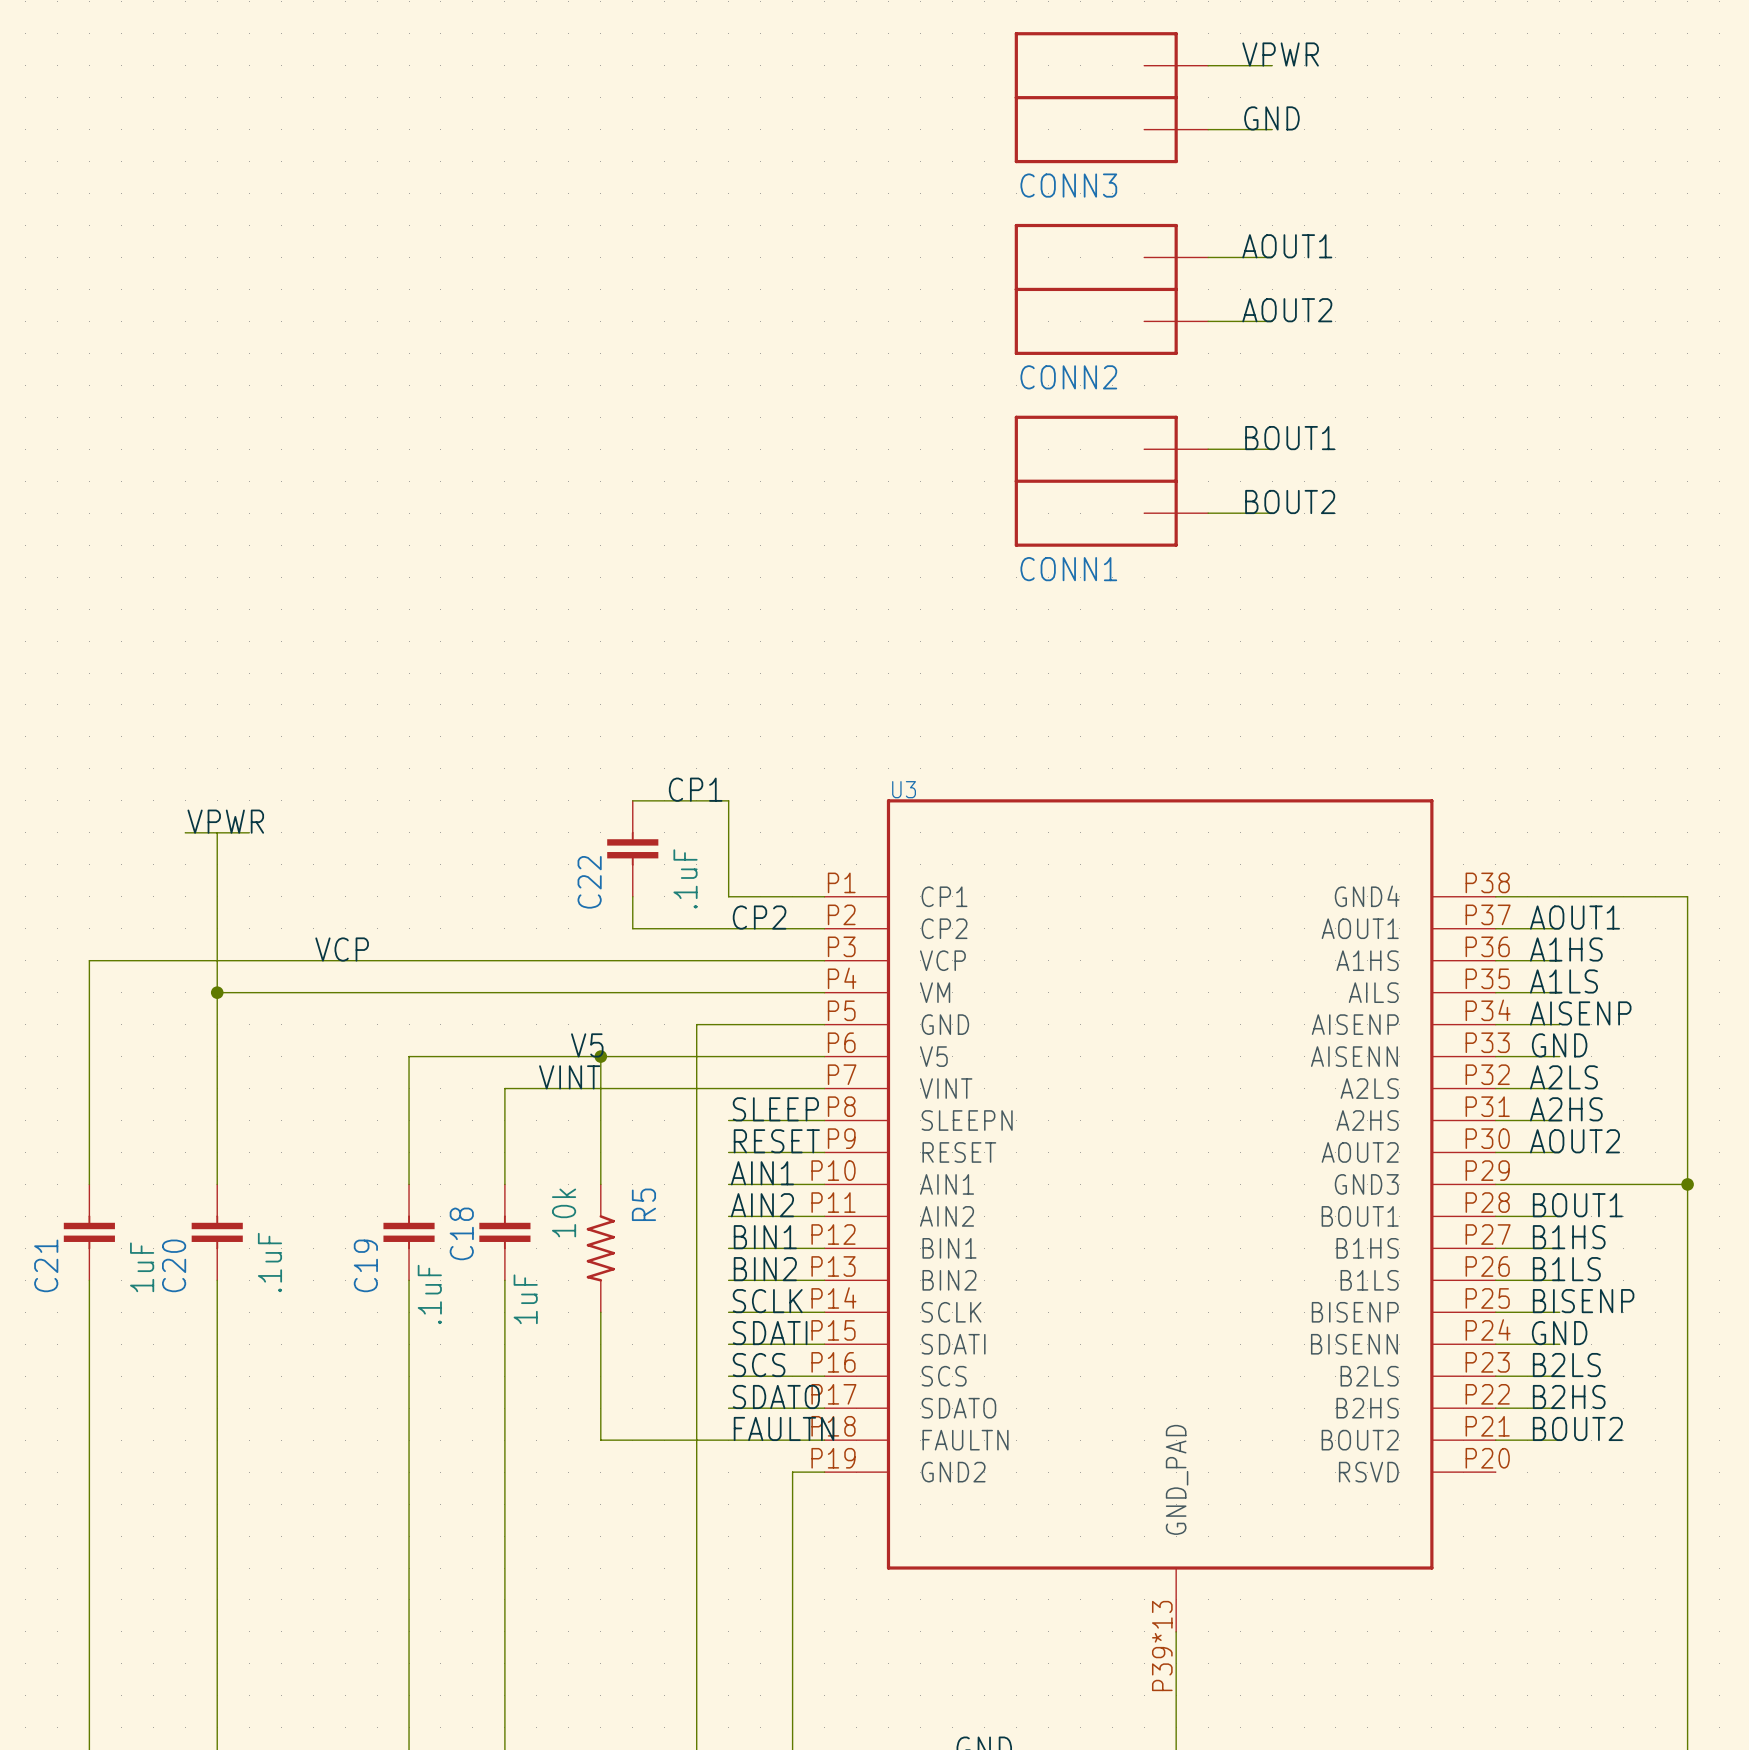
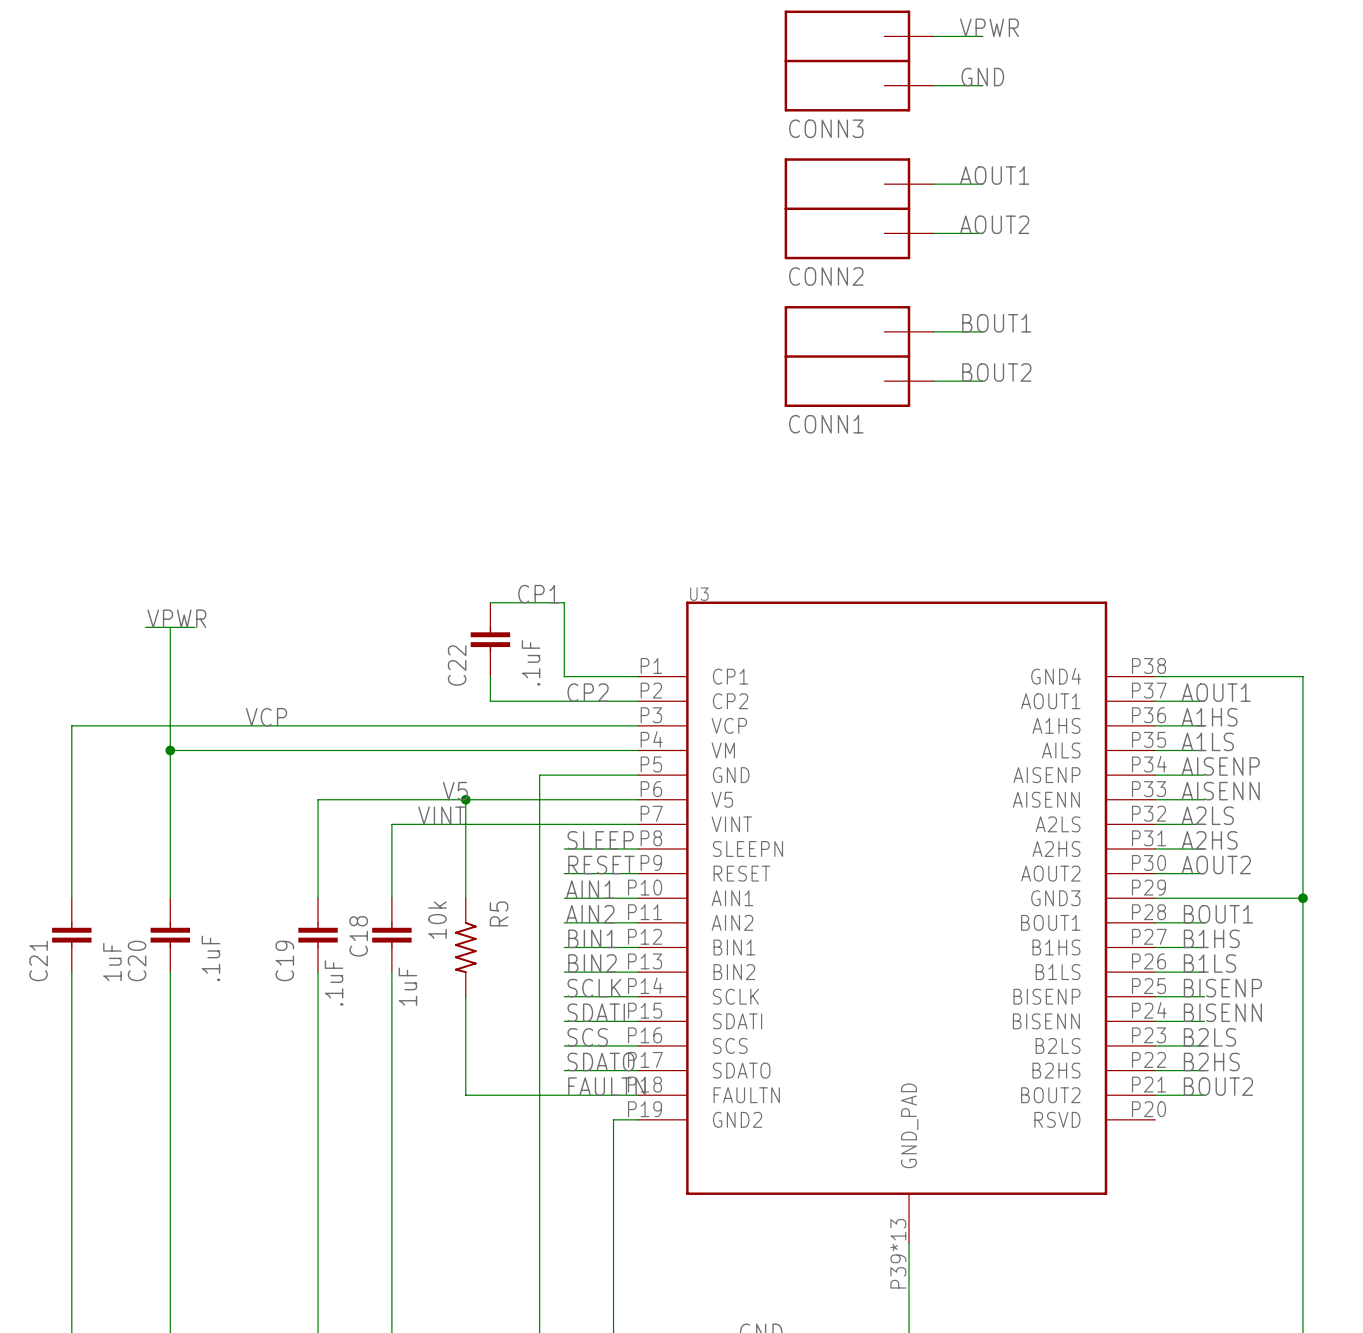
label: GND (1559, 1045) -> AISENN (1220, 791)
label: GND (1559, 1333) -> BISENN (1222, 1012)

